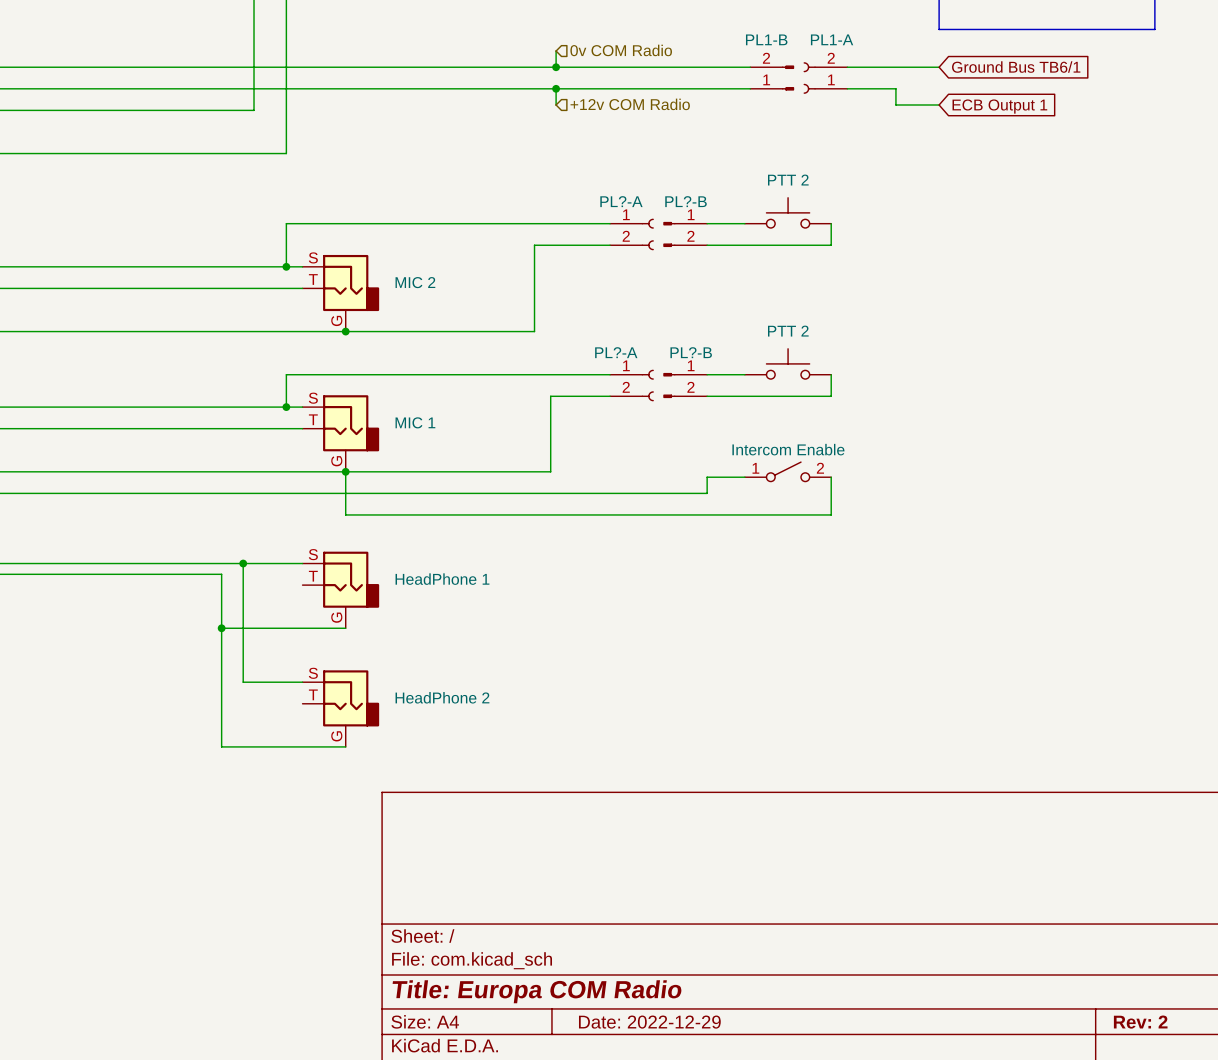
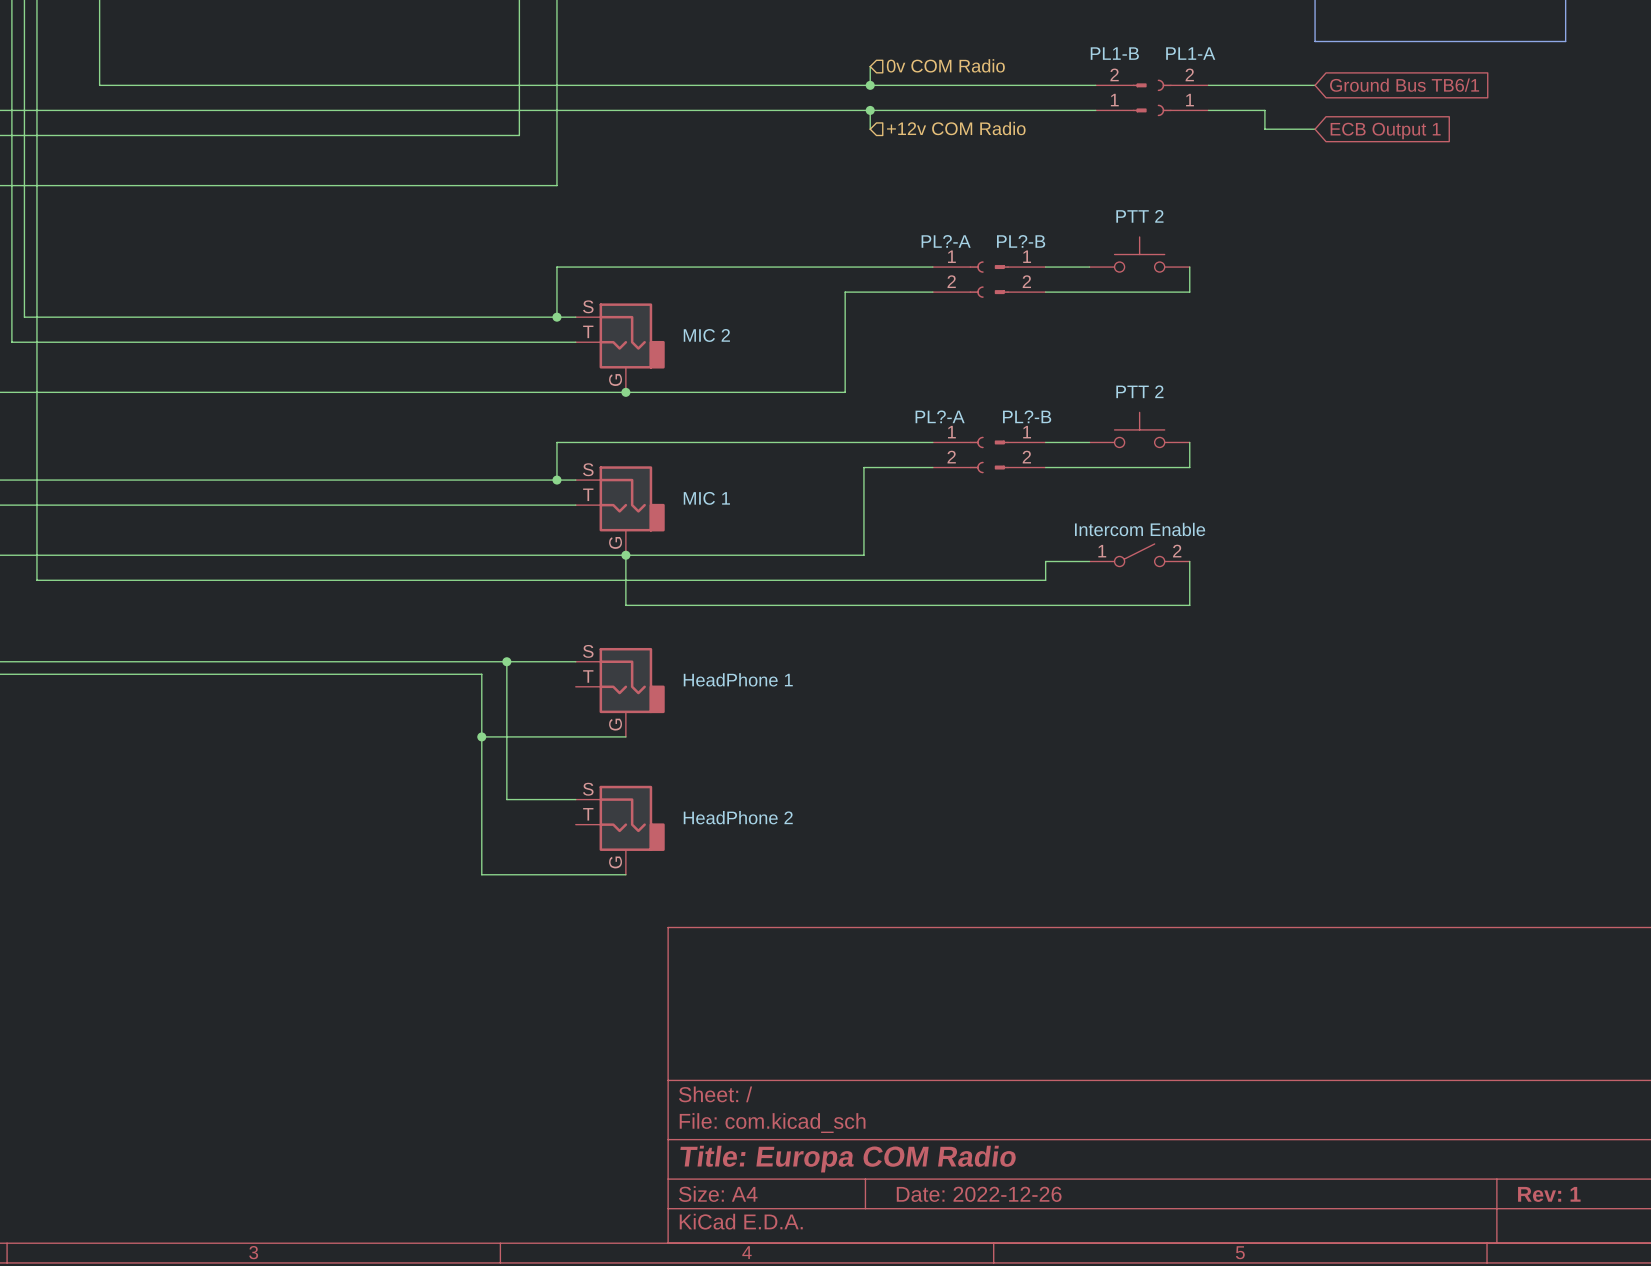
title block: Date: 2022-12-29 (649, 1022) -> Date: 2022-12-26 (979, 1194)
title block: Rev: 2 (1140, 1022) -> Rev: 1 (1549, 1194)

